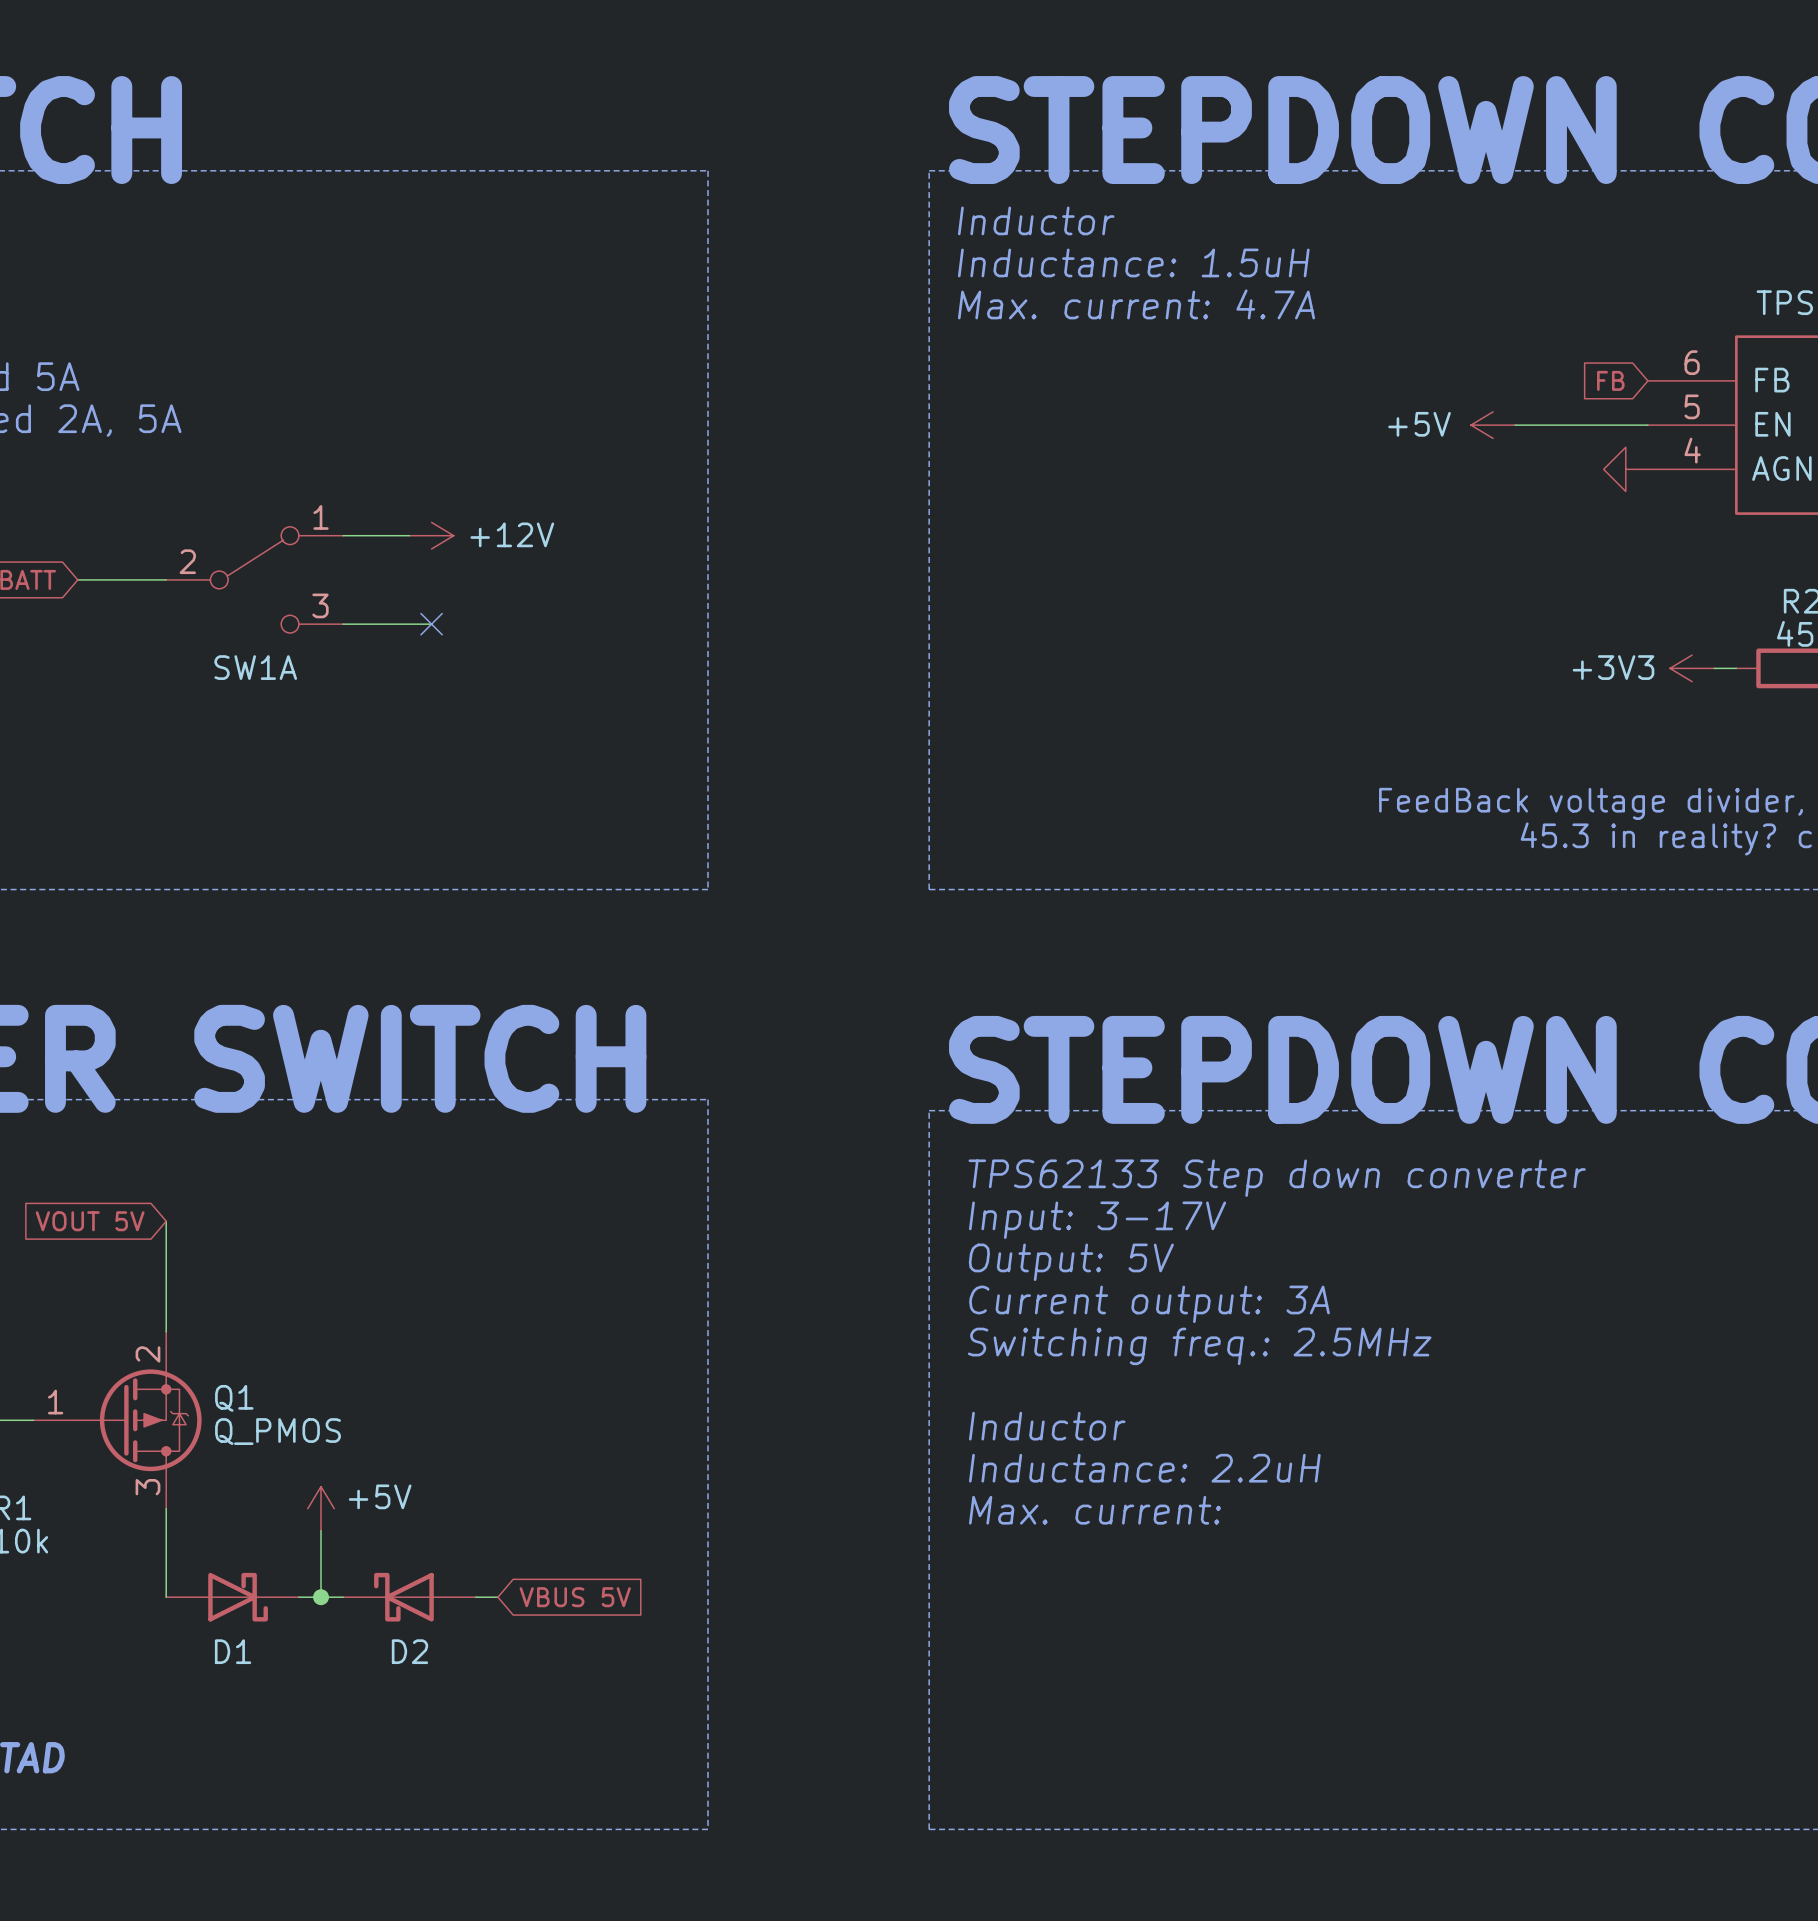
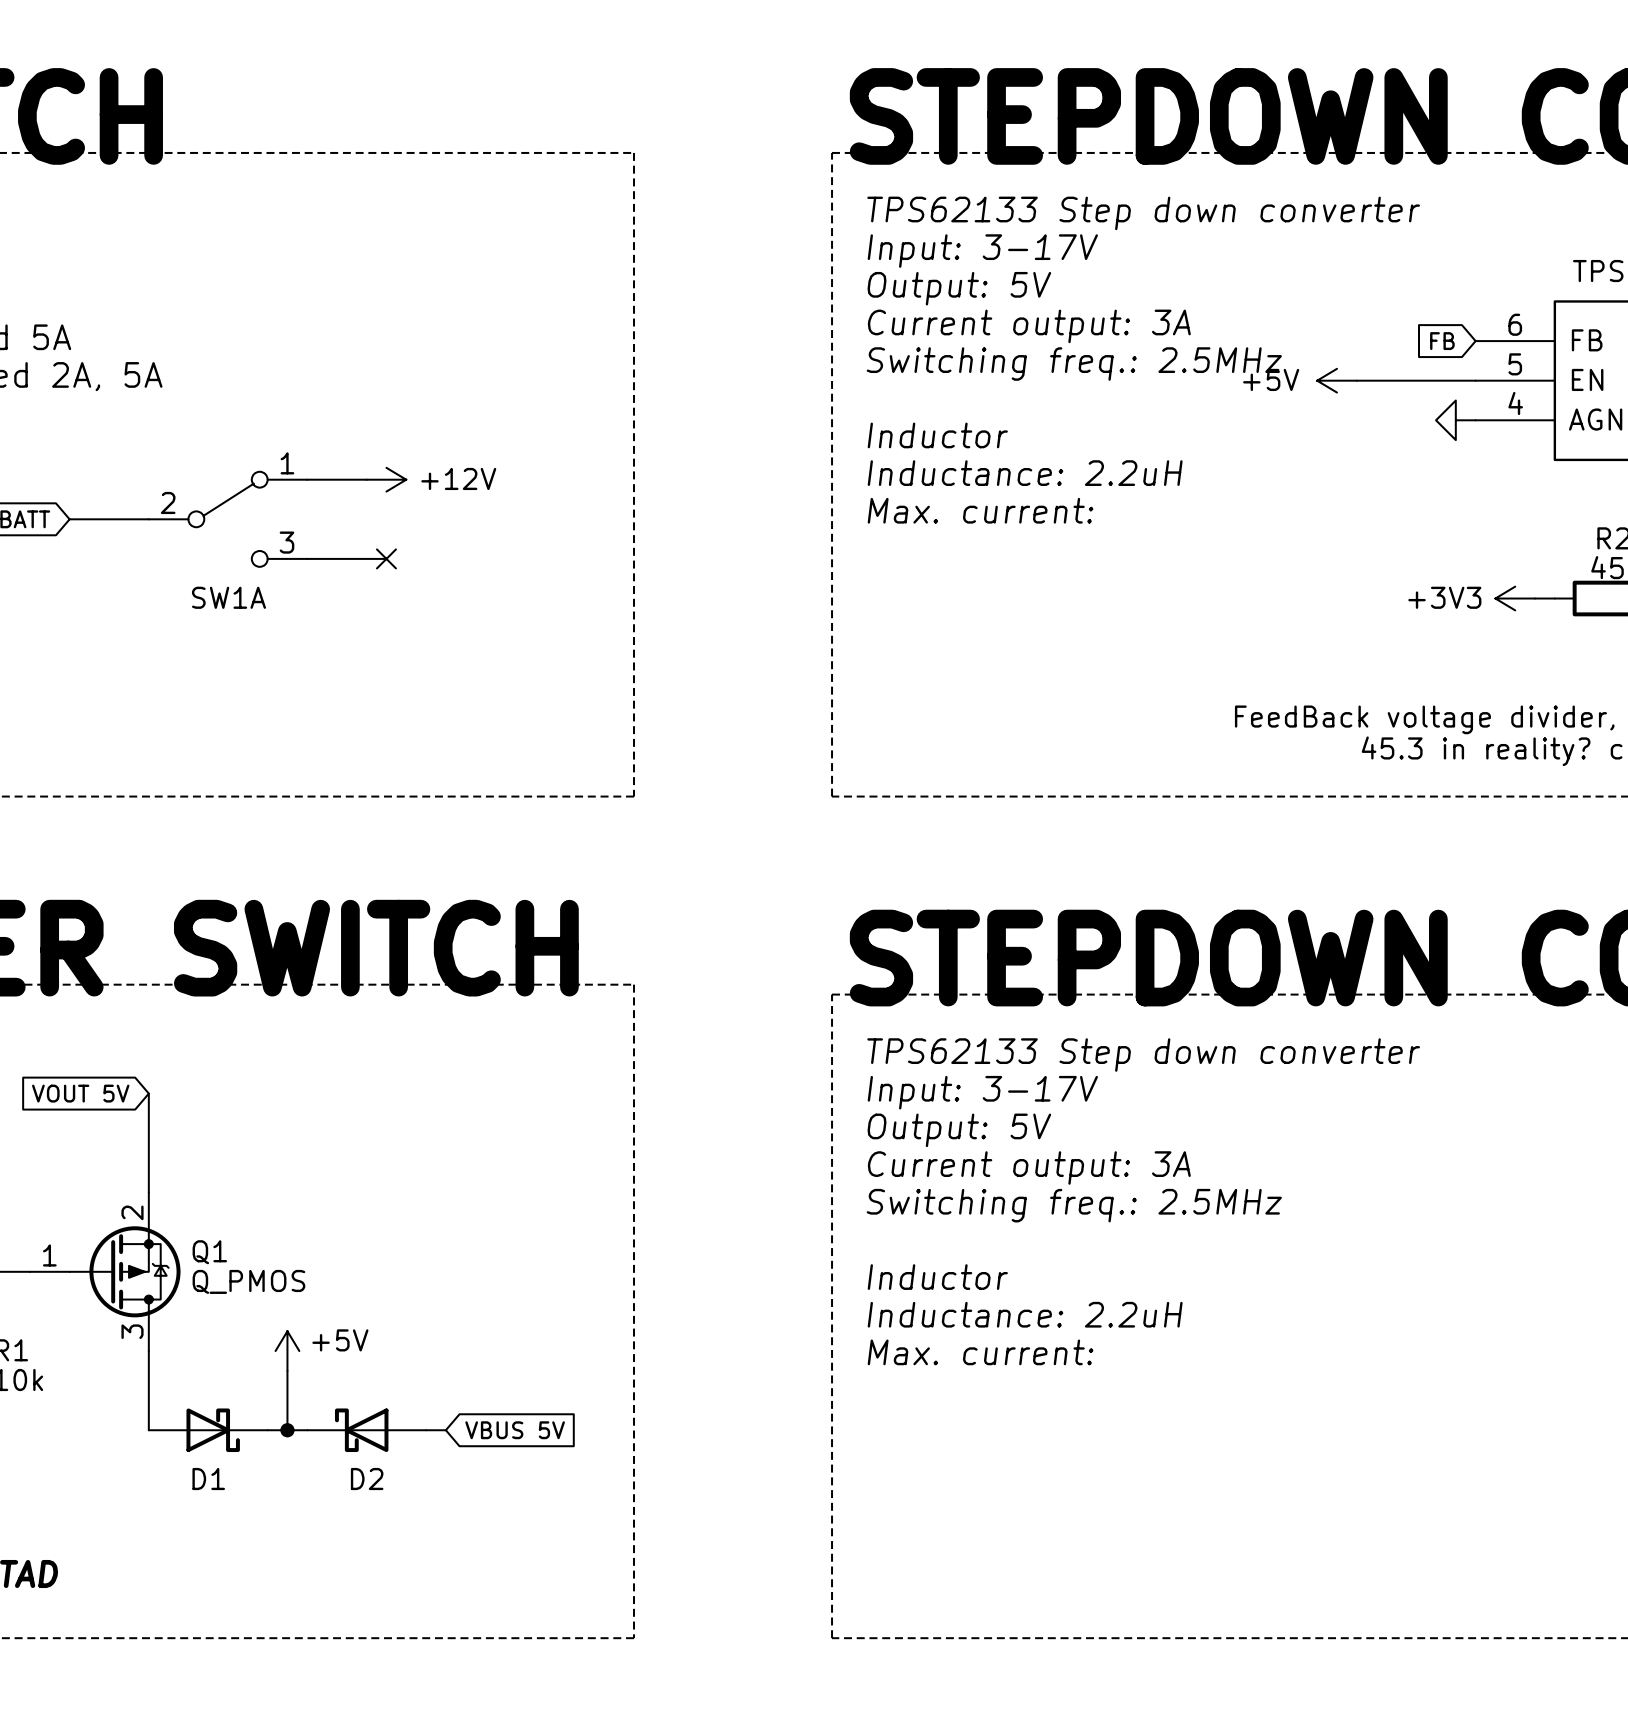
text position: Inductor (1036, 220) -> Inductor (937, 435)
text: none -> TPS62133 Step down converter (1143, 213)
text: Inductance: 1.5uH (1133, 262) -> none
text: none -> Input: 3-17V (982, 251)
text: Max. current: 4.7A (1136, 304) -> none
text: none -> Output: 5V (959, 288)
text: none -> Current output: 3A (1029, 326)
text: none -> Switching freq.: 2.5MHz (1074, 364)
text: none -> Inductance: 2.2uH (1025, 473)
text: none -> Max. current: (980, 510)

